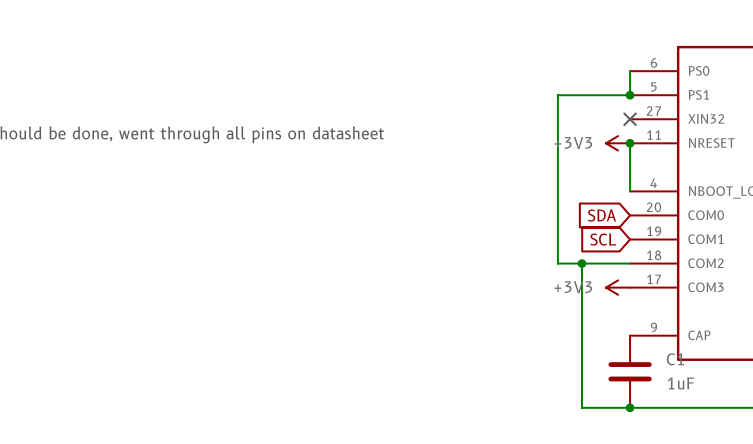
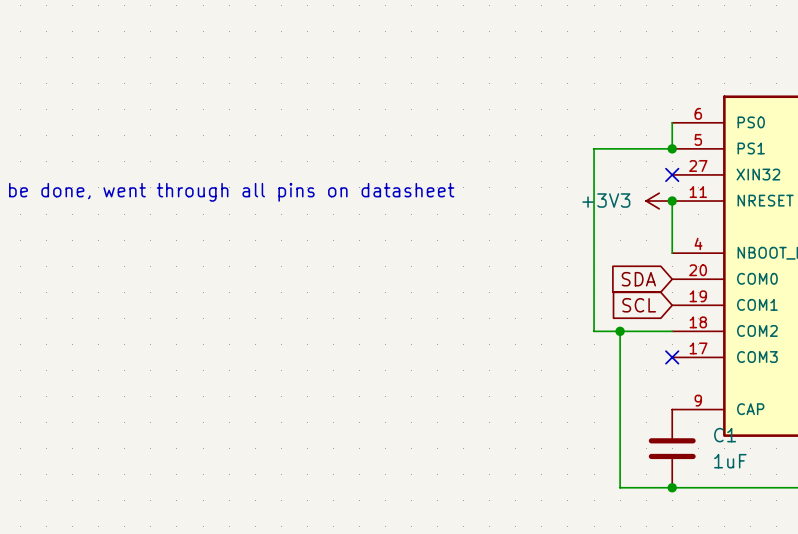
power symbol: +3V3 (618, 287) -> none
no-connect mark: none -> (672, 357)

